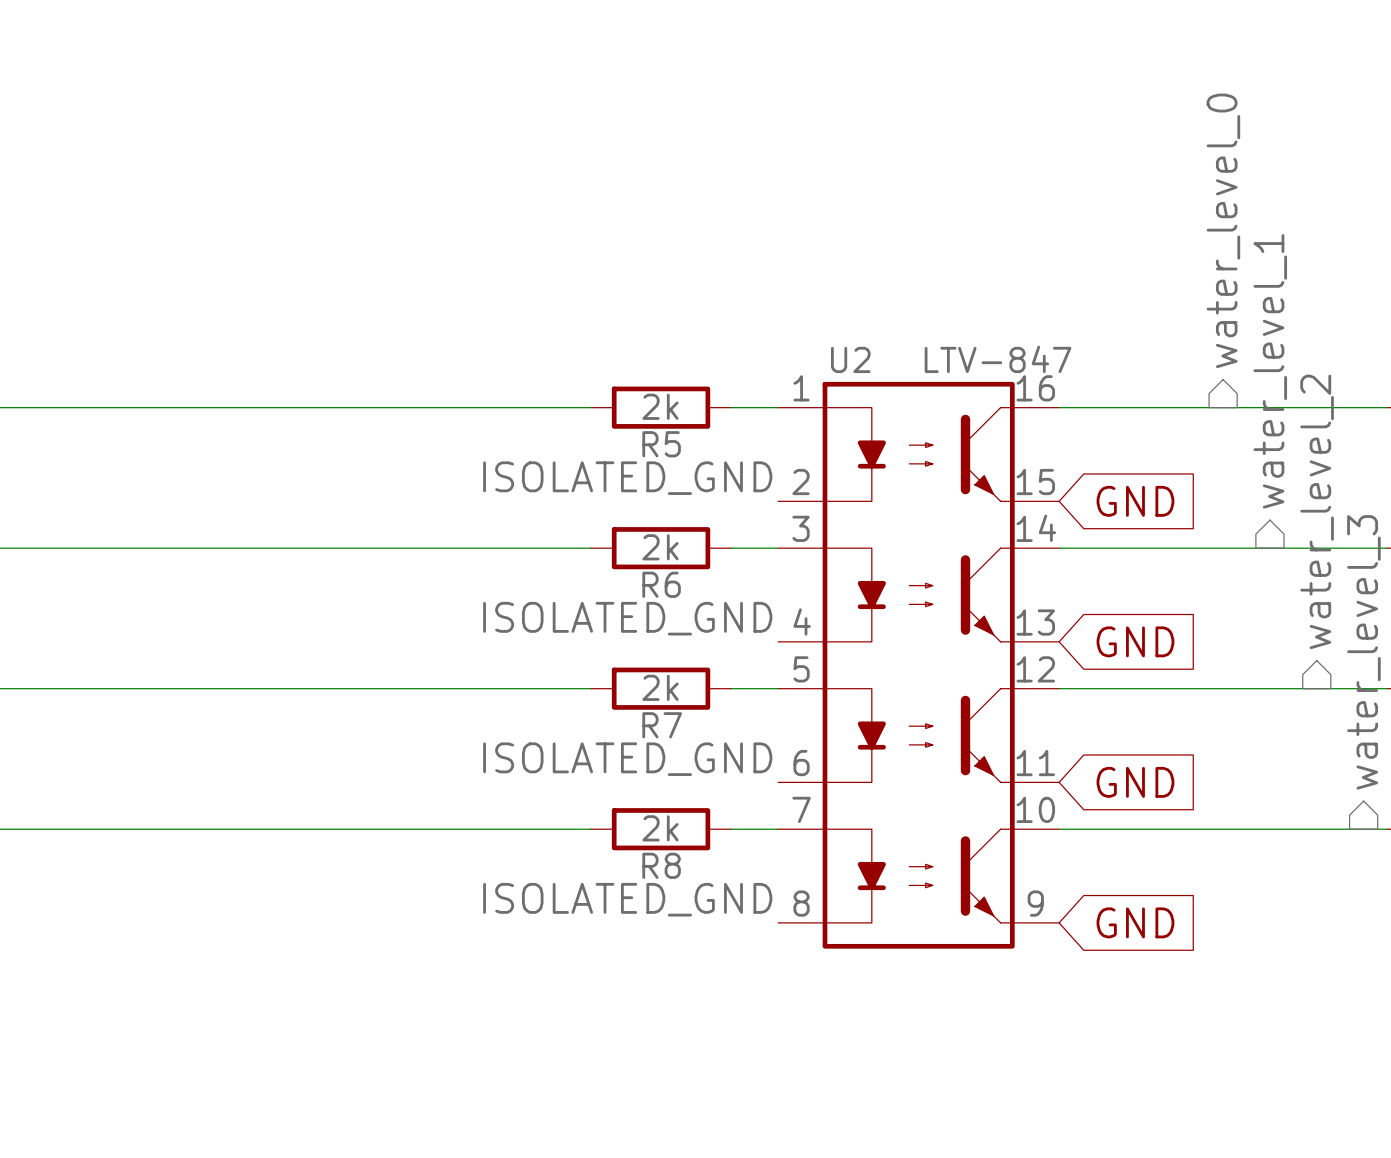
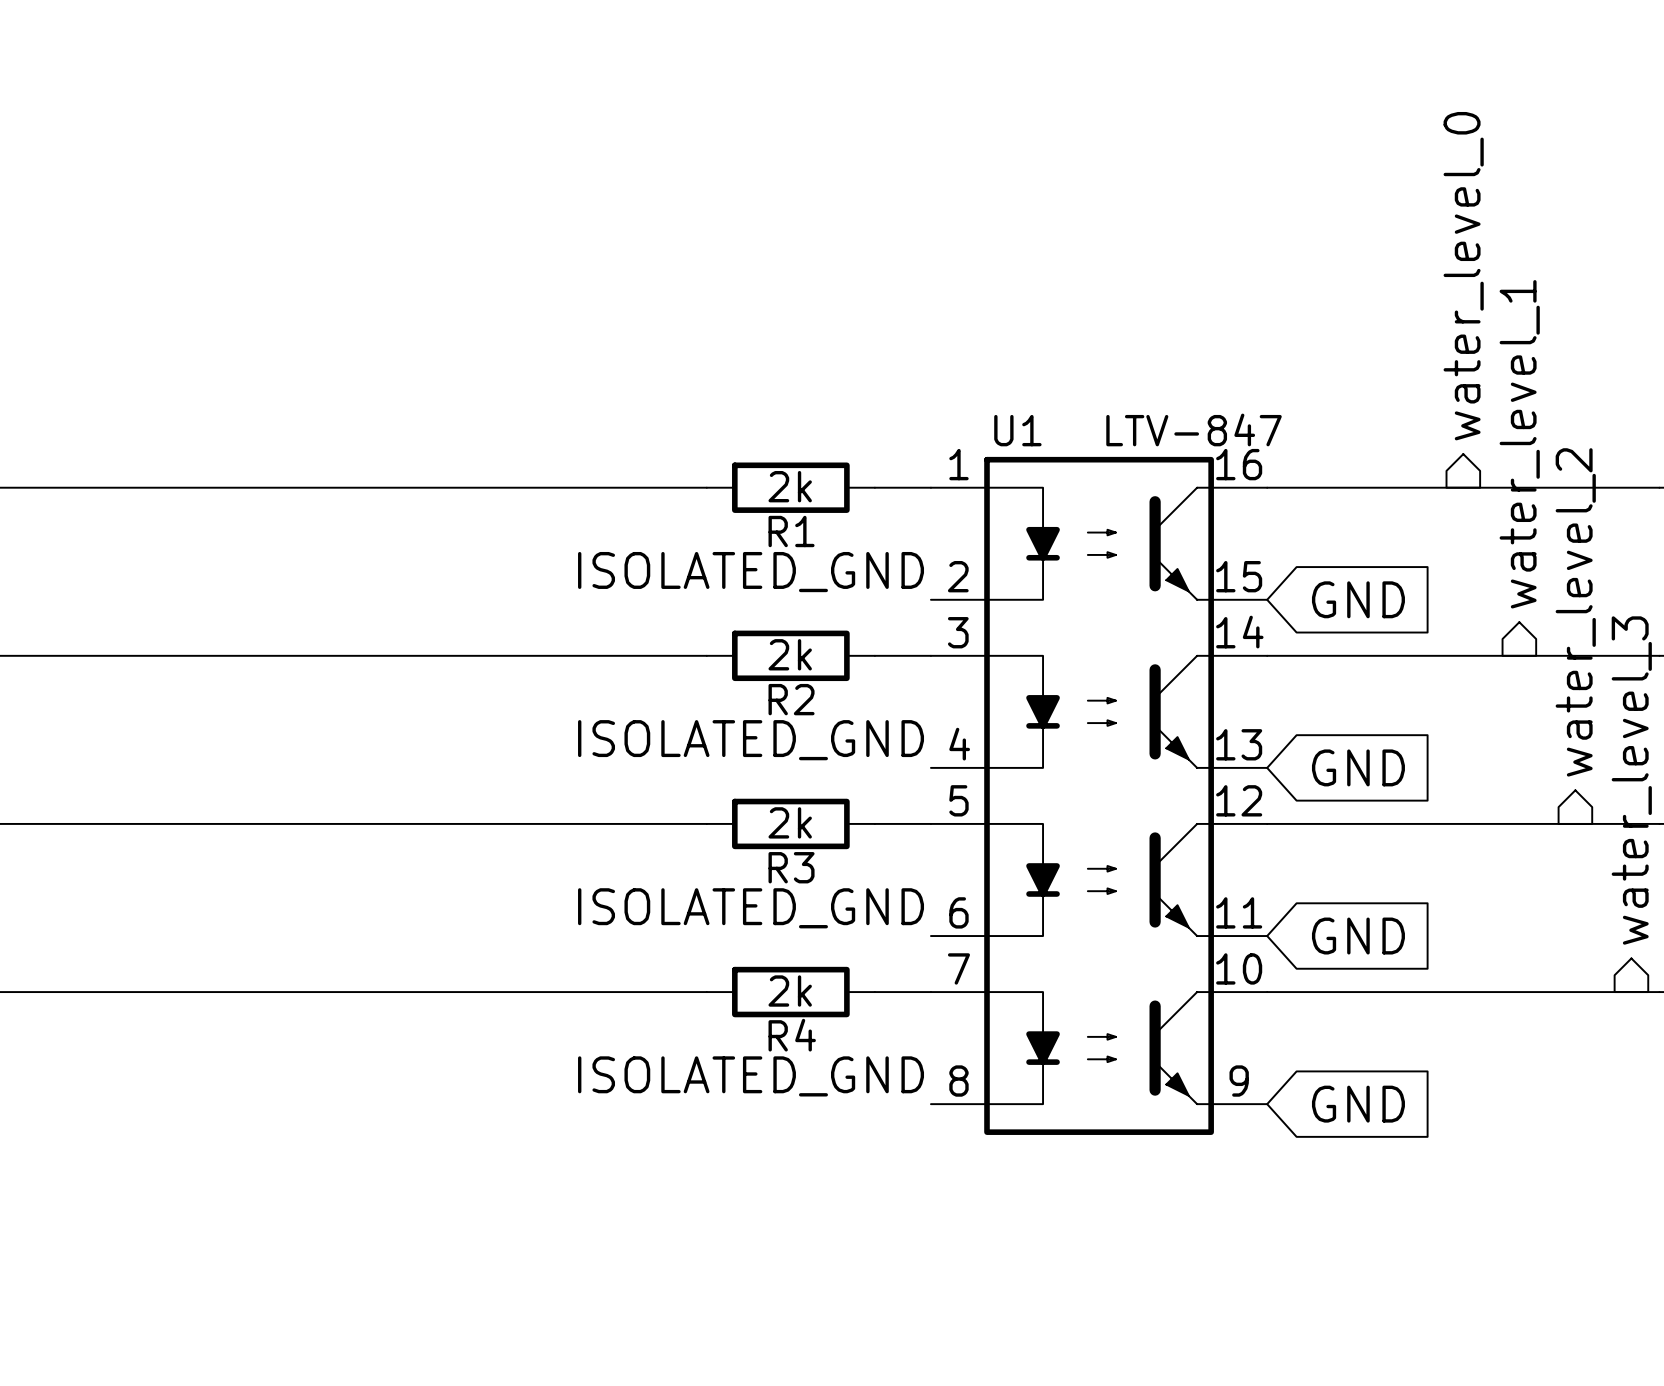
U2 name: U2 (850, 359) -> U1 (1017, 430)
R5 name: R5 (661, 444) -> R1 (791, 531)
R6 name: R6 (661, 584) -> R2 (791, 699)
R7 name: R7 (662, 725) -> R3 (791, 867)
R8 name: R8 (661, 865) -> R4 (792, 1035)

